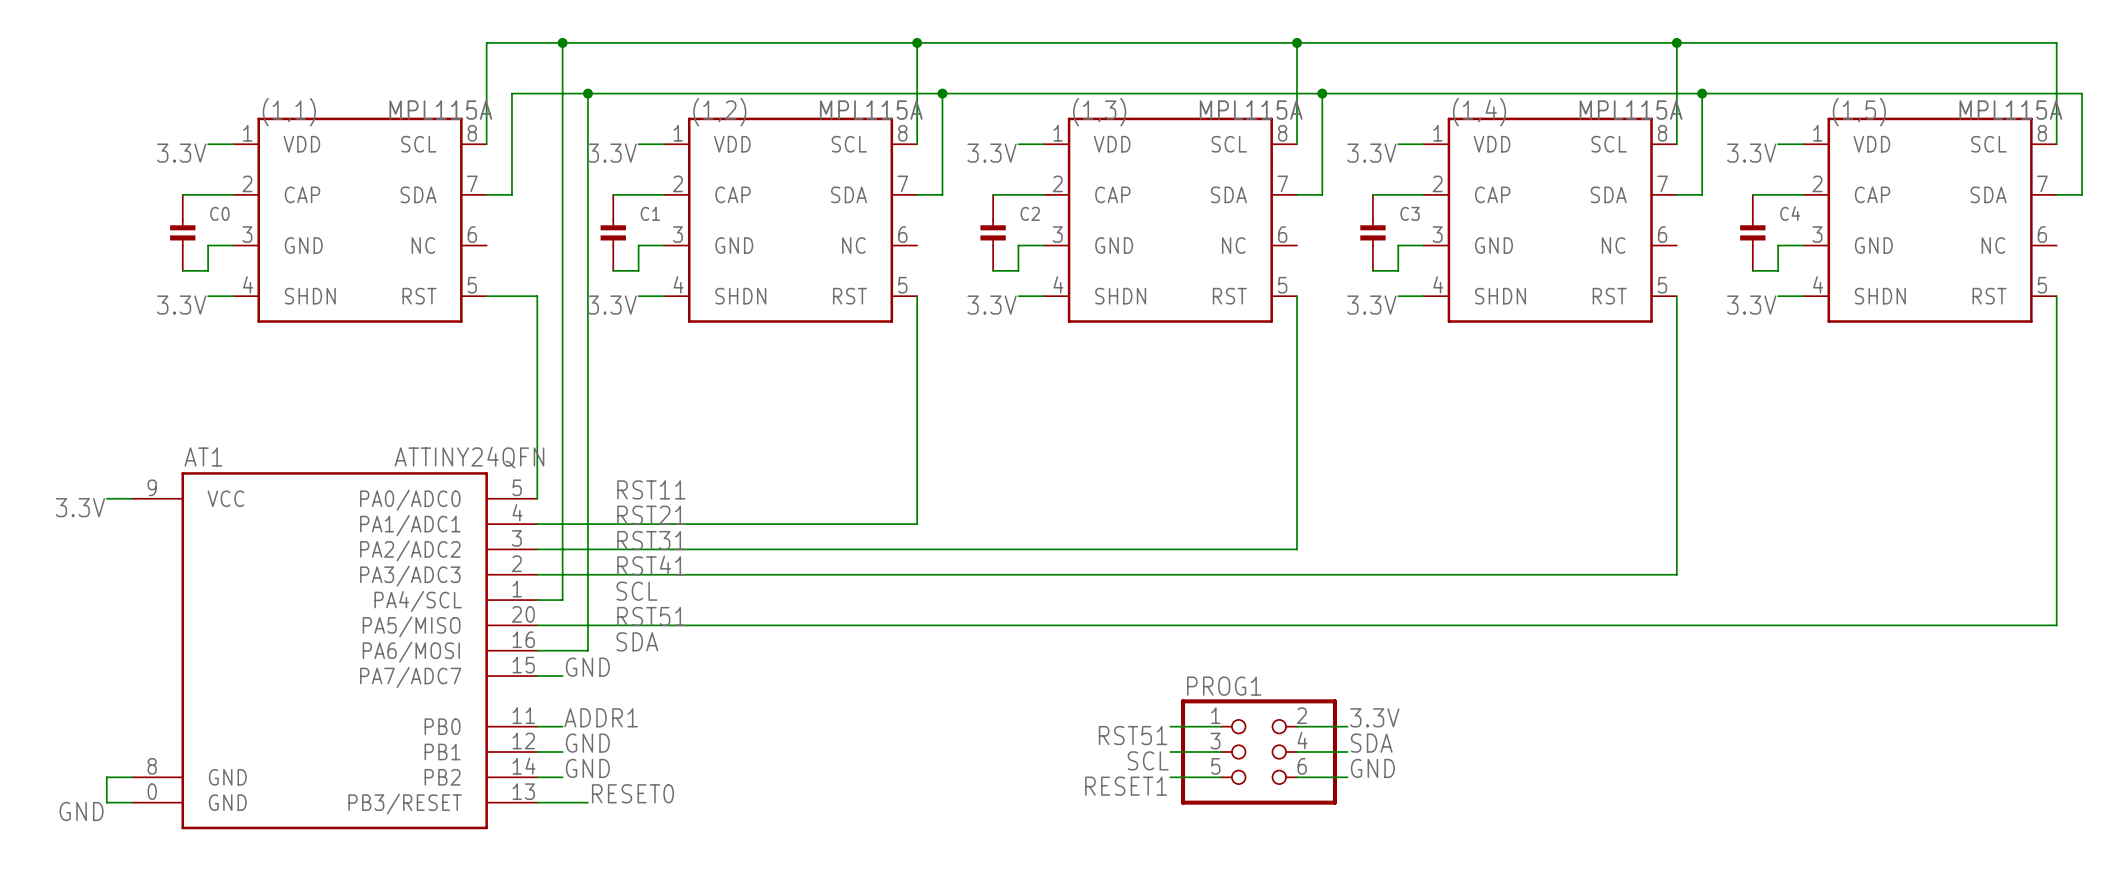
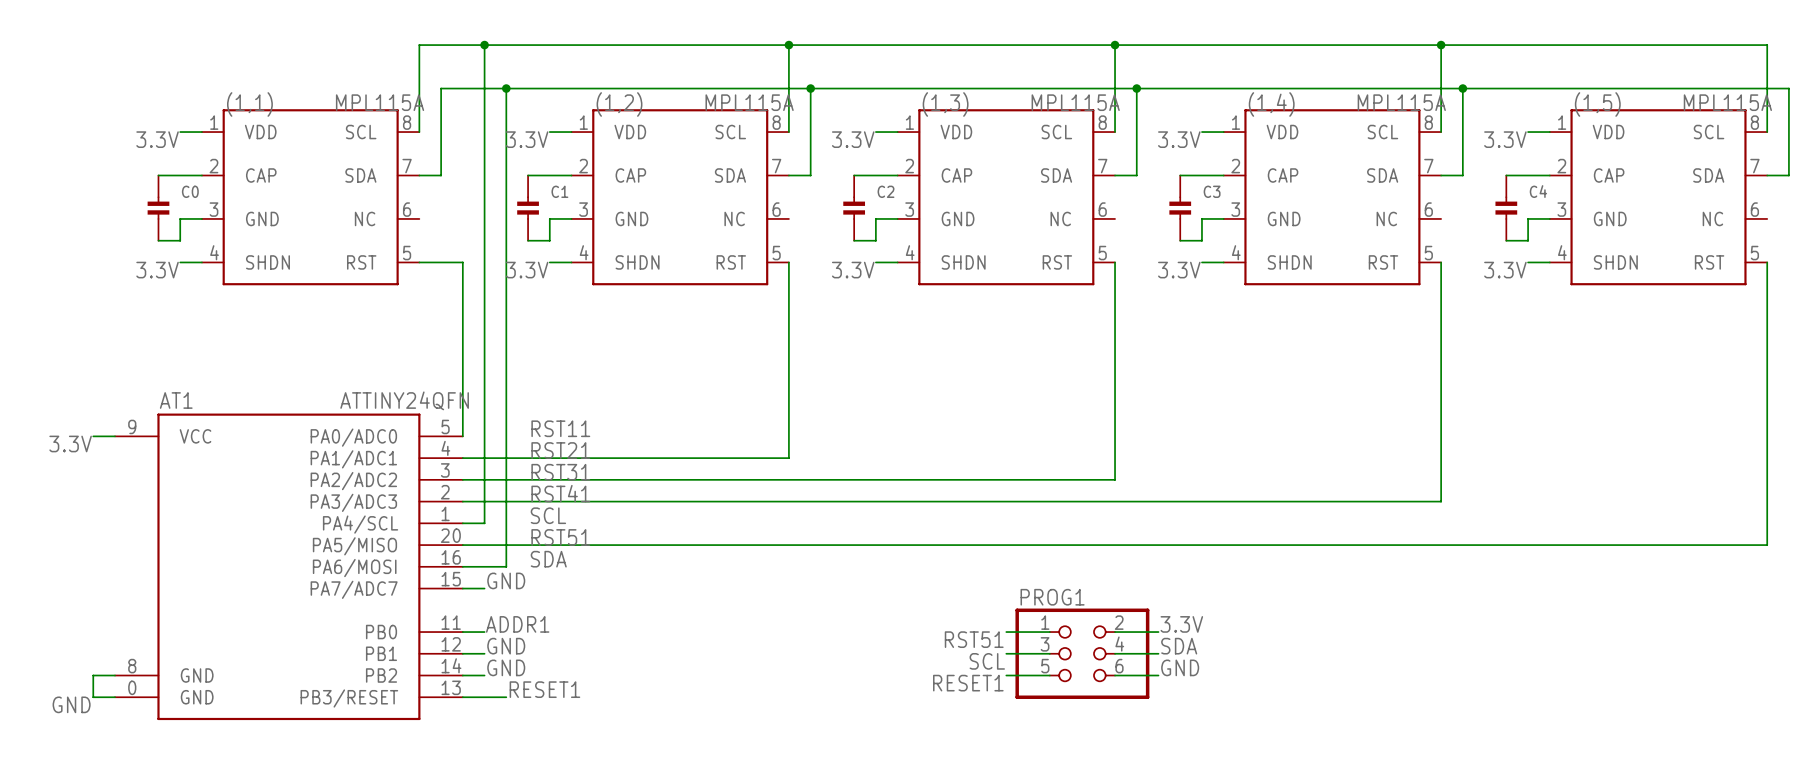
label: RESET0 (632, 793) -> RESET1 (544, 689)

